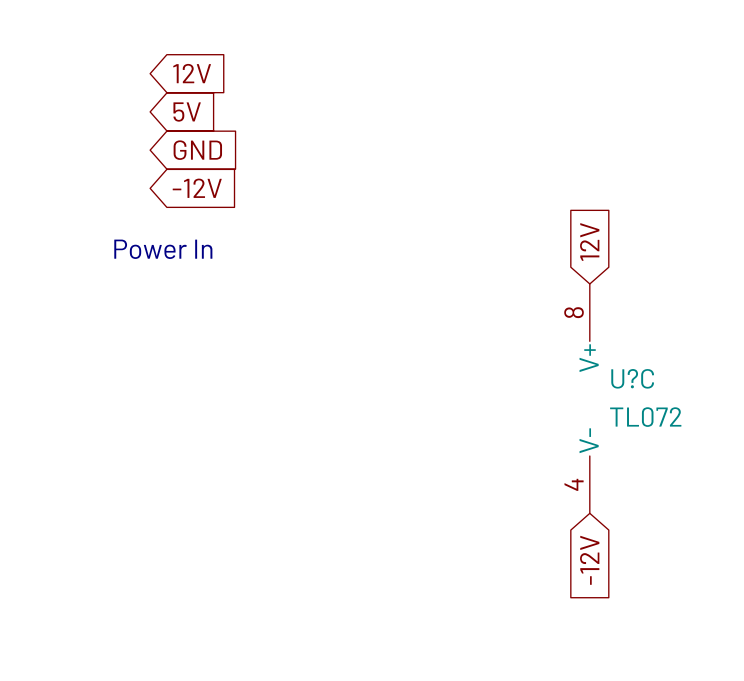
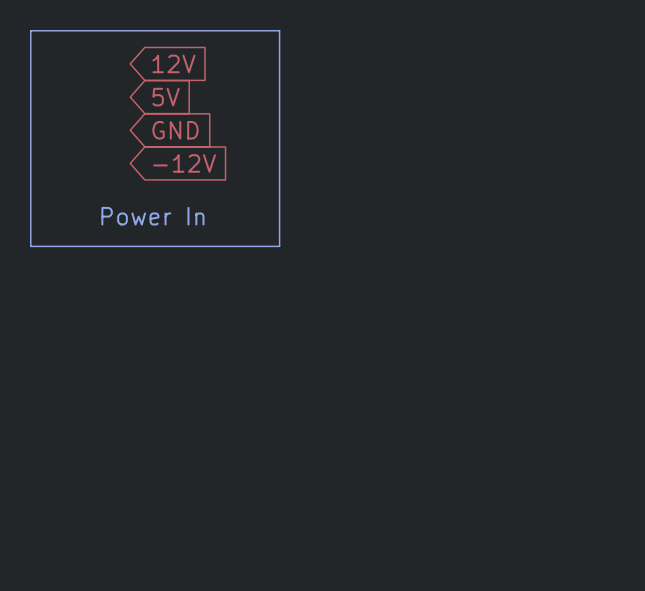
line: none -> (30, 30) (30, 246) (279, 246) (279, 30) (30, 30)
global label: 12V (589, 241) -> none
U?C: TL072 (589, 398) -> none
global label: -12V (589, 560) -> none

